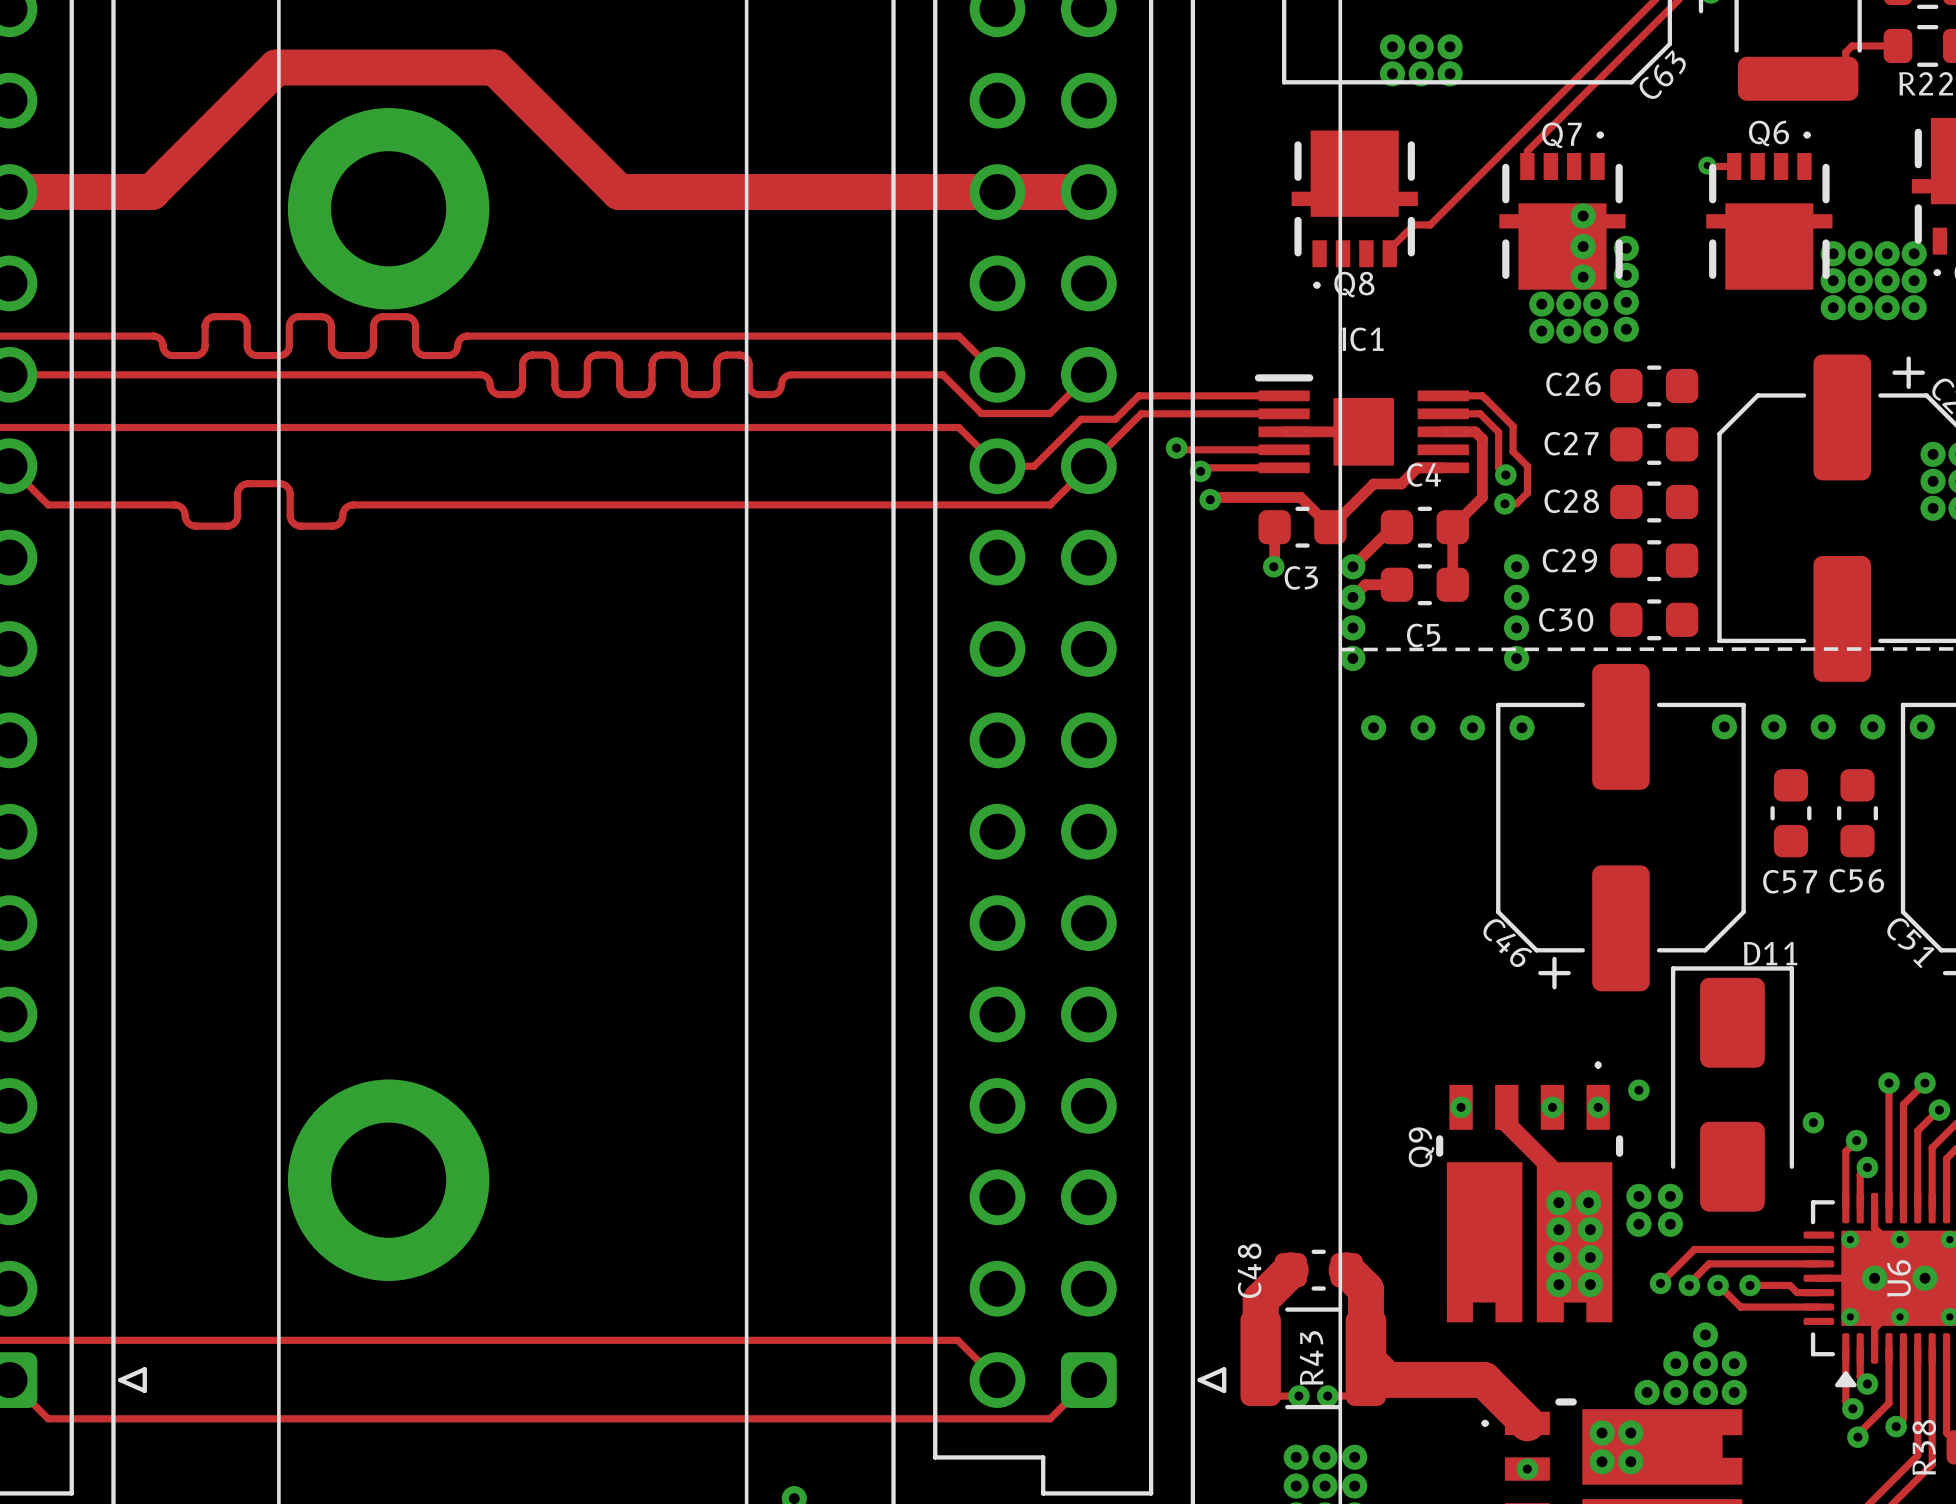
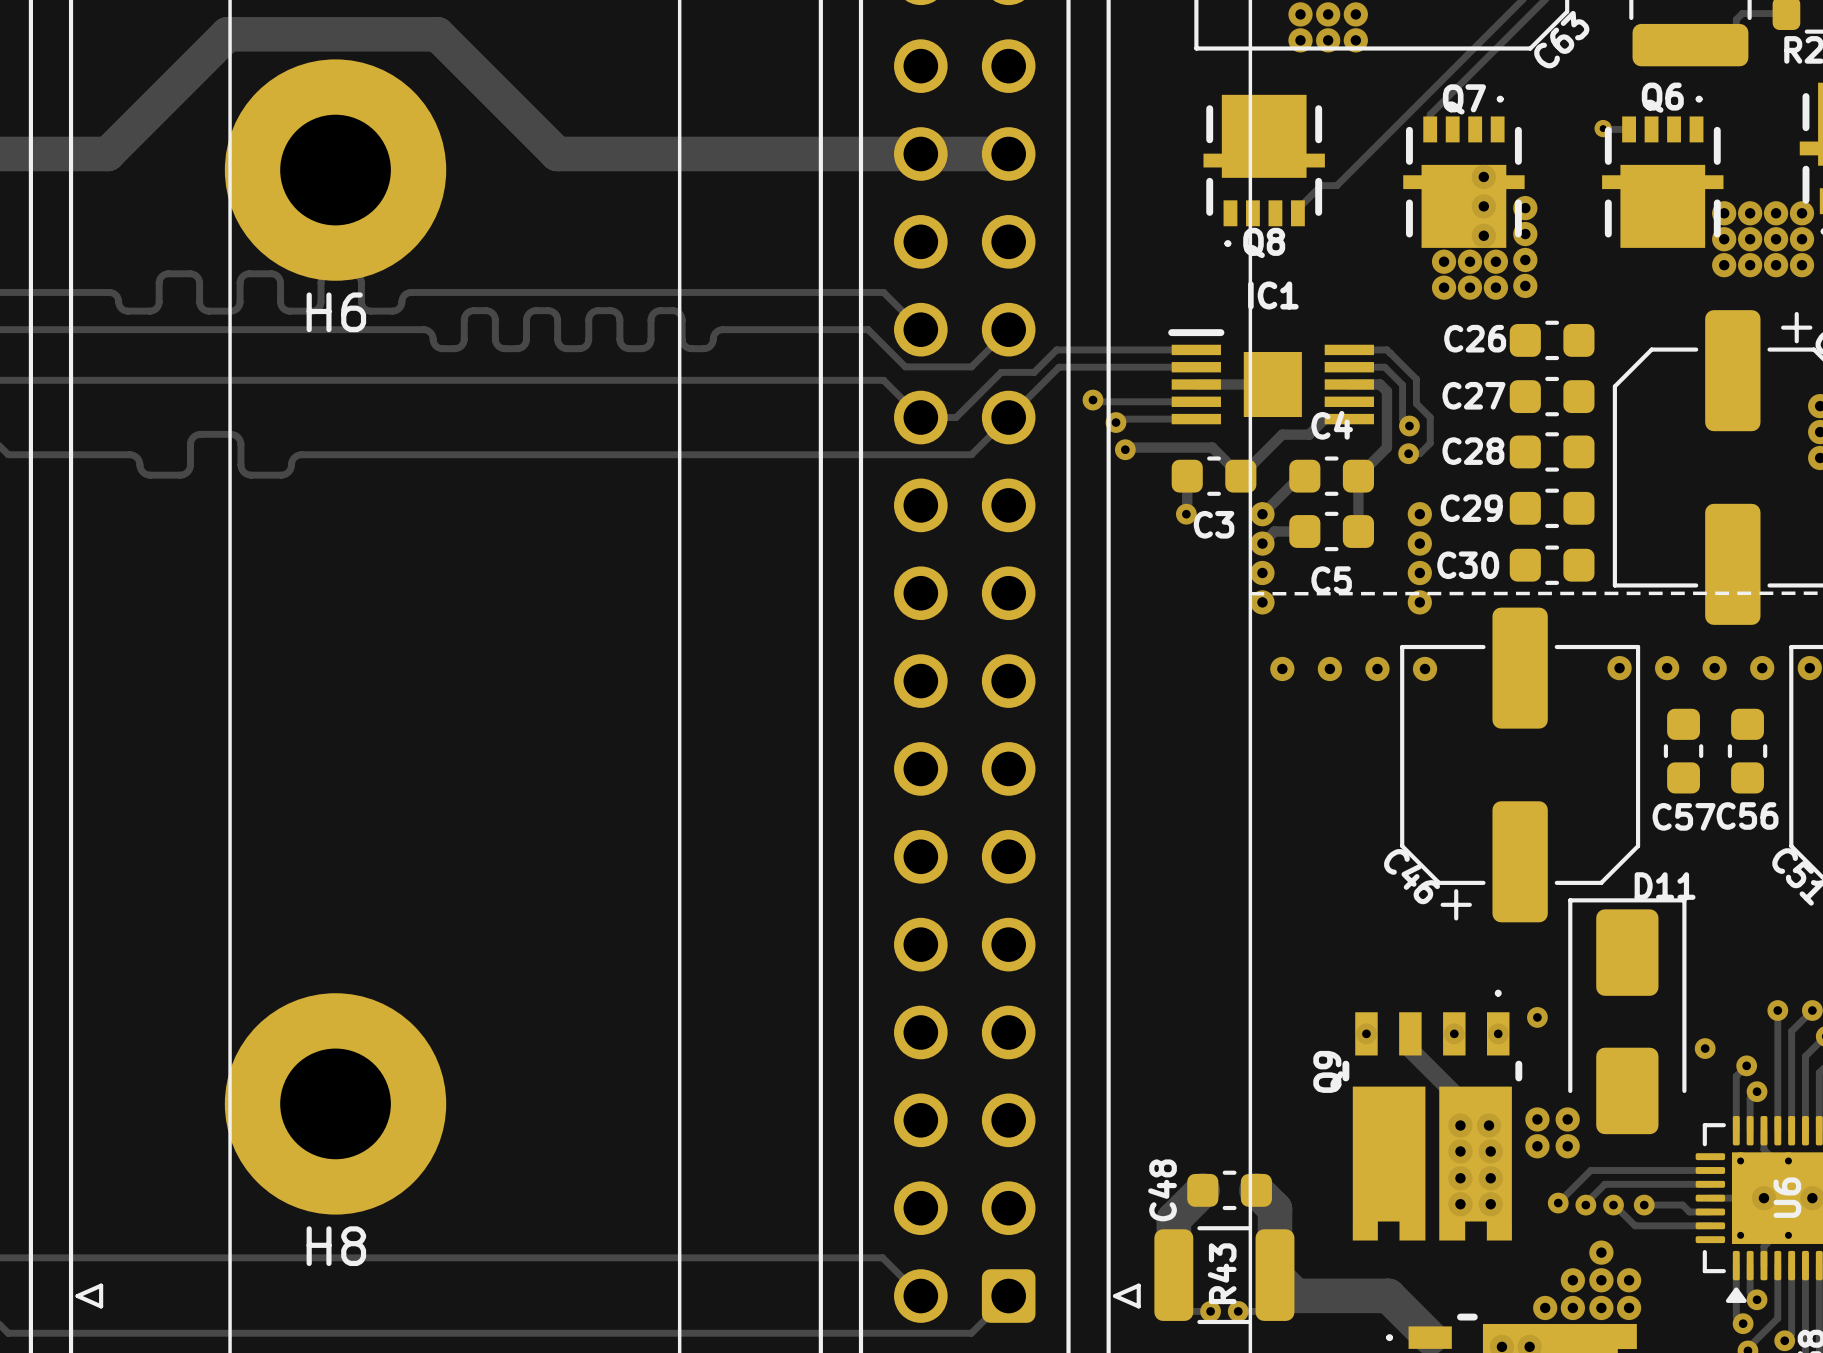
part: (388, 208) -> none
H6: none -> (335, 170)
part: (388, 1180) -> none
H8: none -> (335, 1103)

